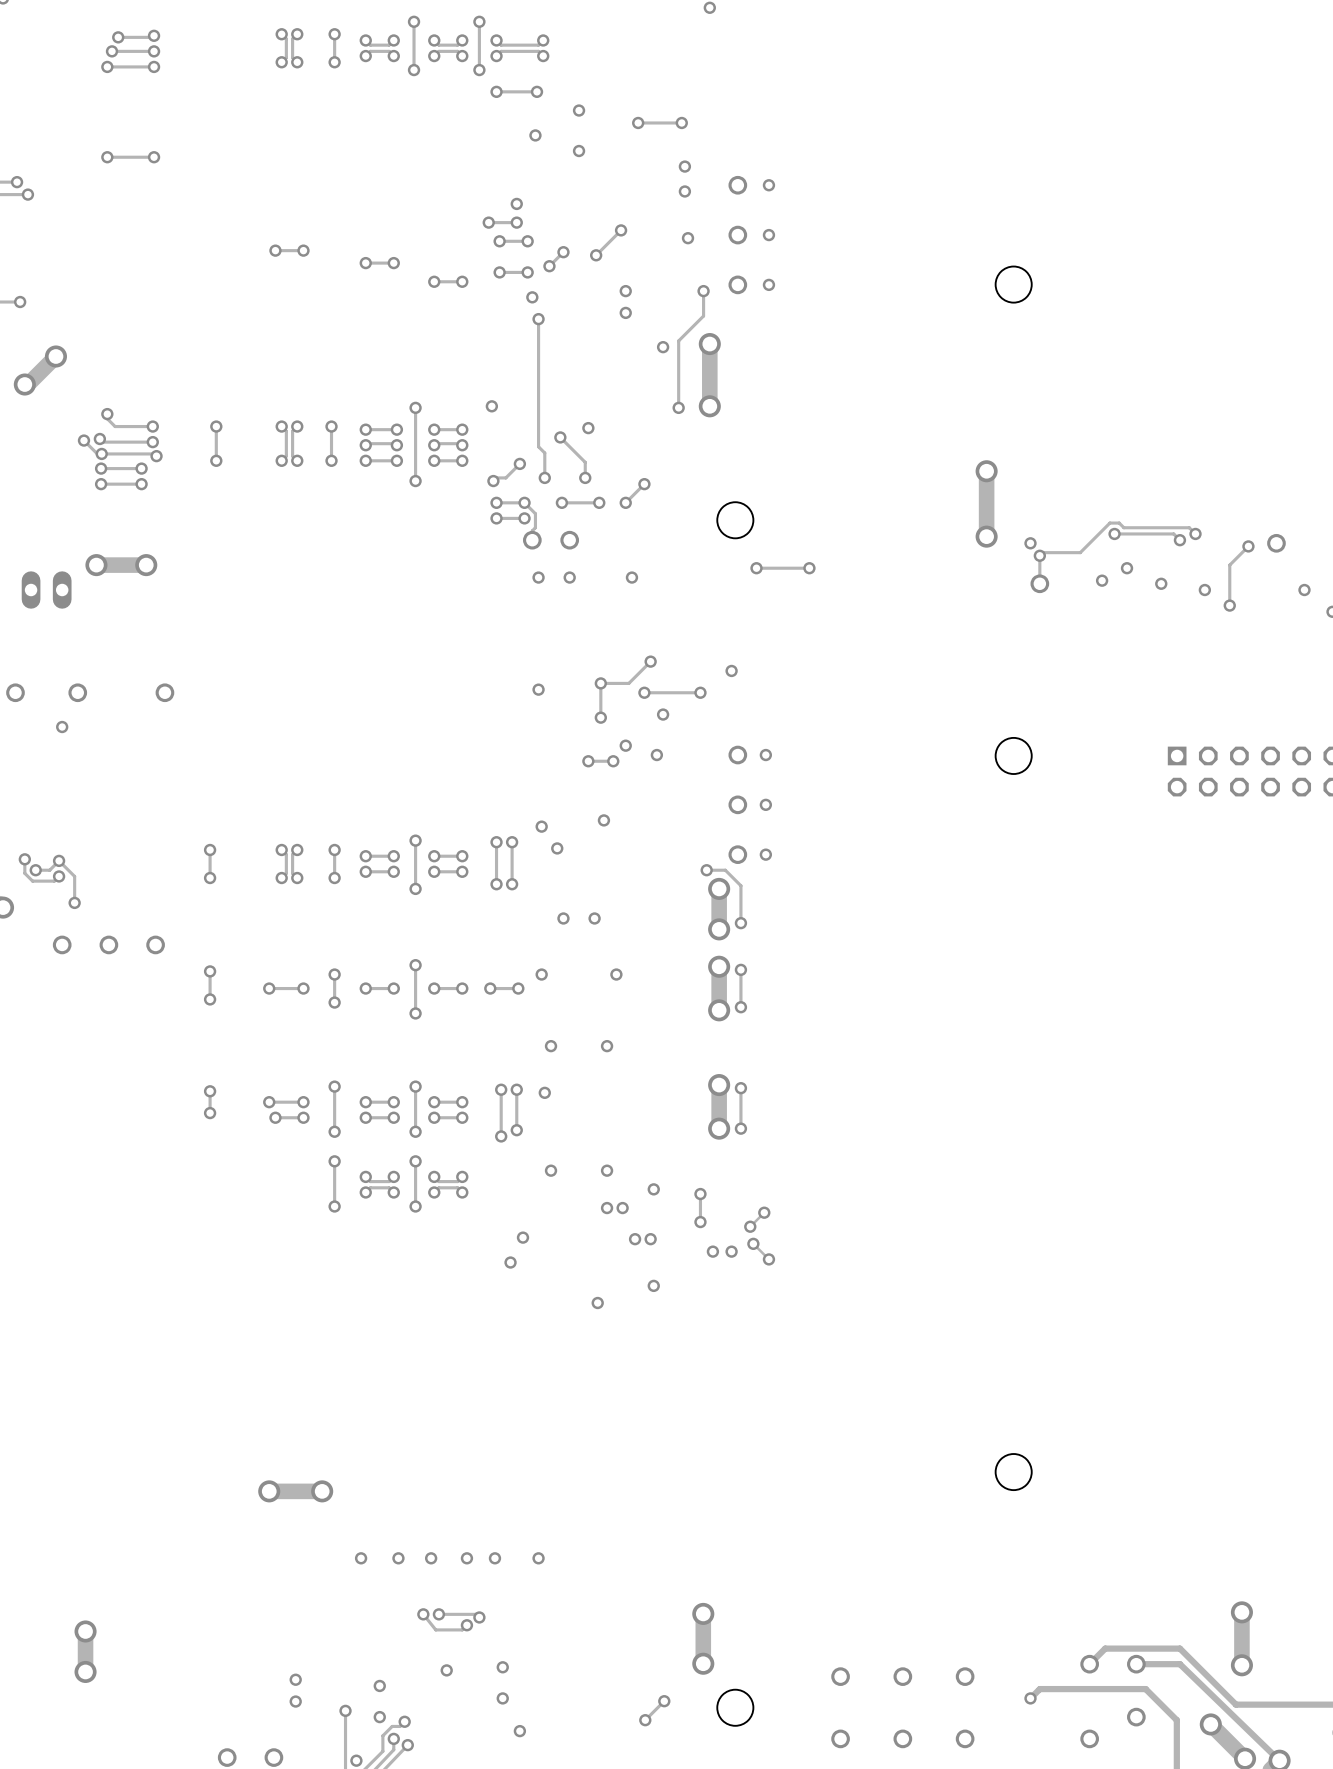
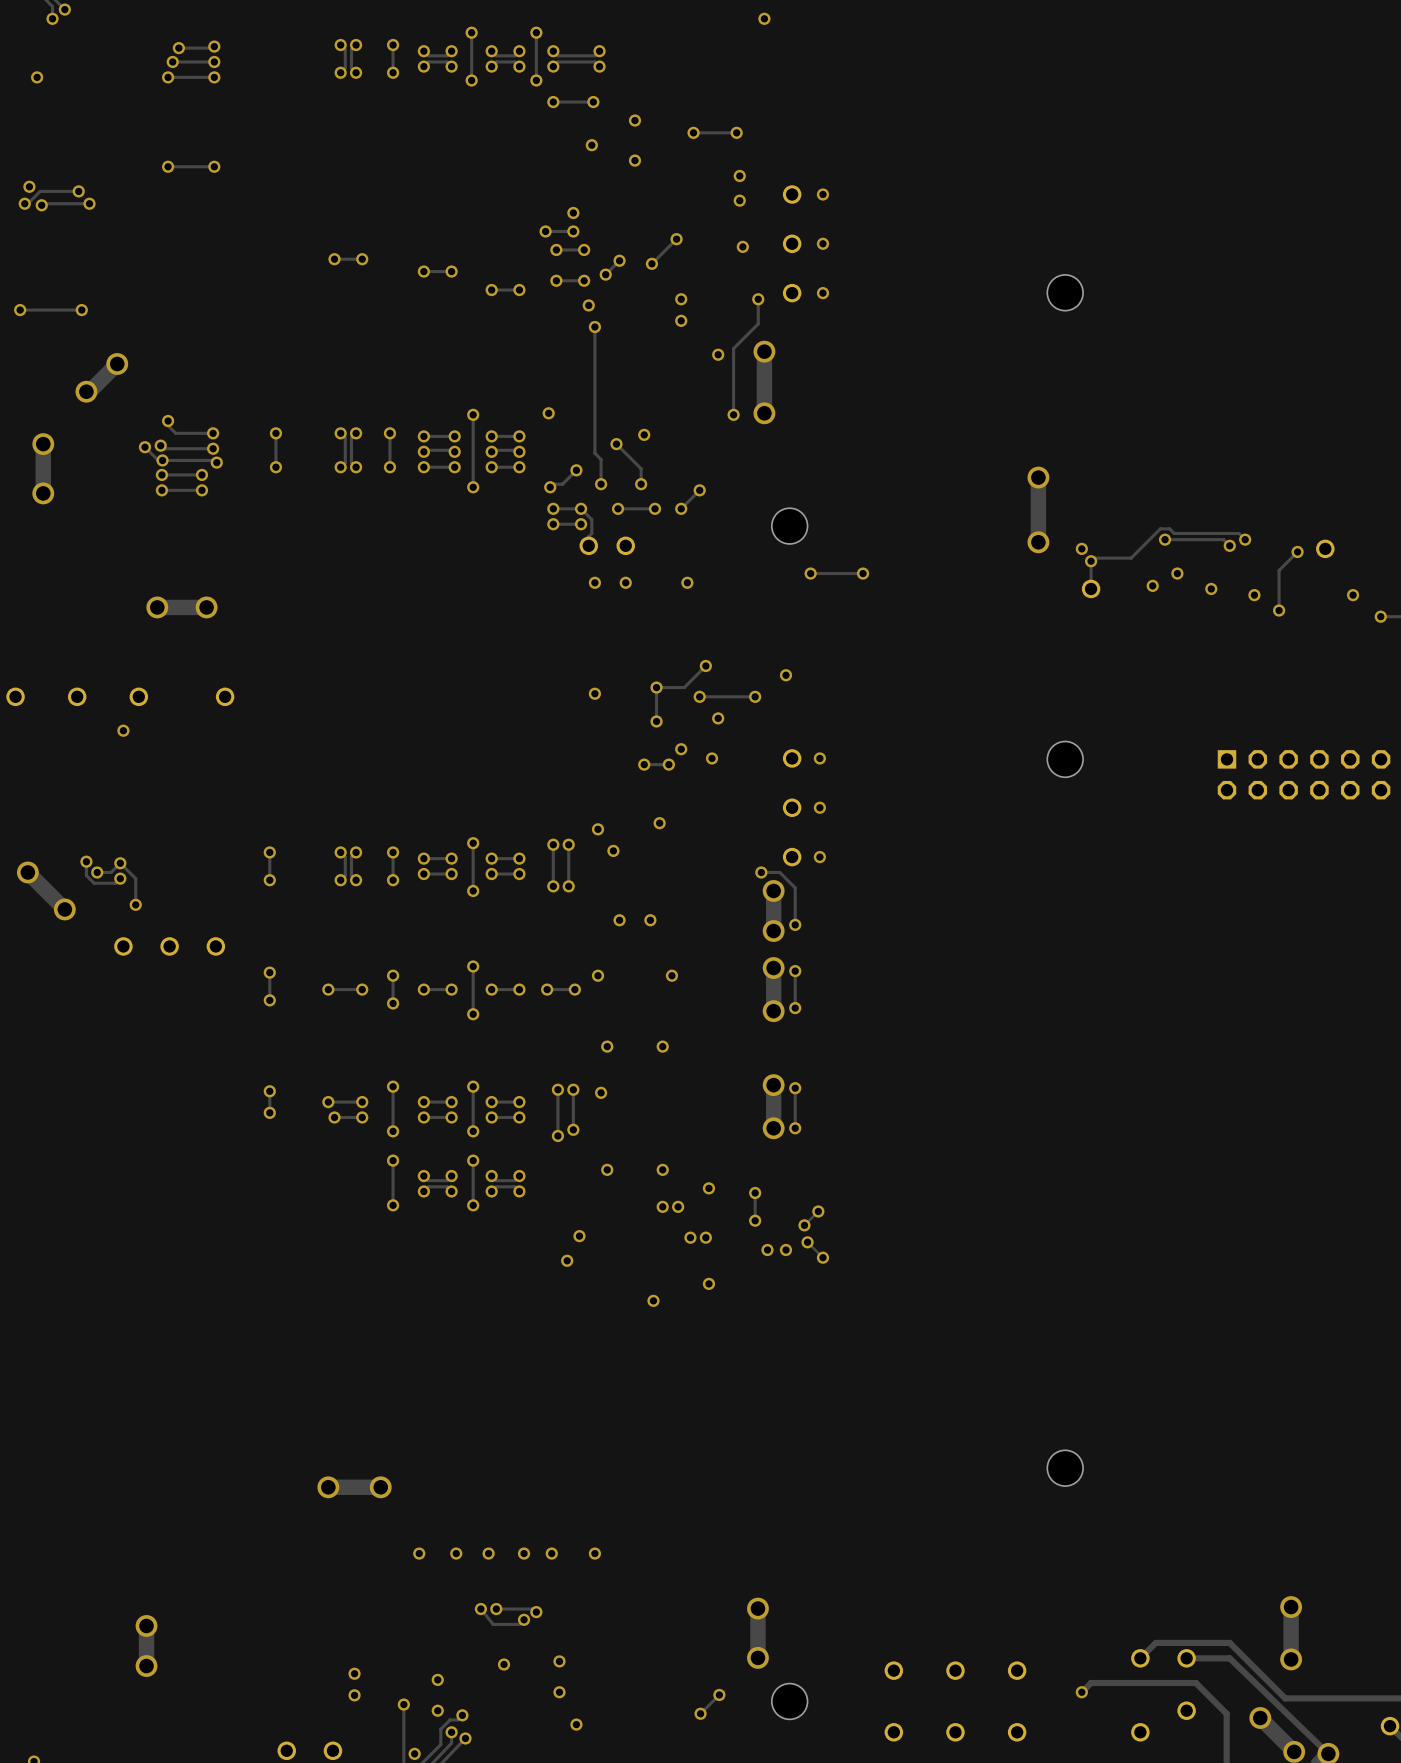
via: (96, 565) -> none
track: (146, 565) (96, 565) -> (206, 607) (157, 607)
via: (146, 565) -> none
part: (46, 590) -> none
via: none -> (157, 607)
via: none -> (206, 607)

